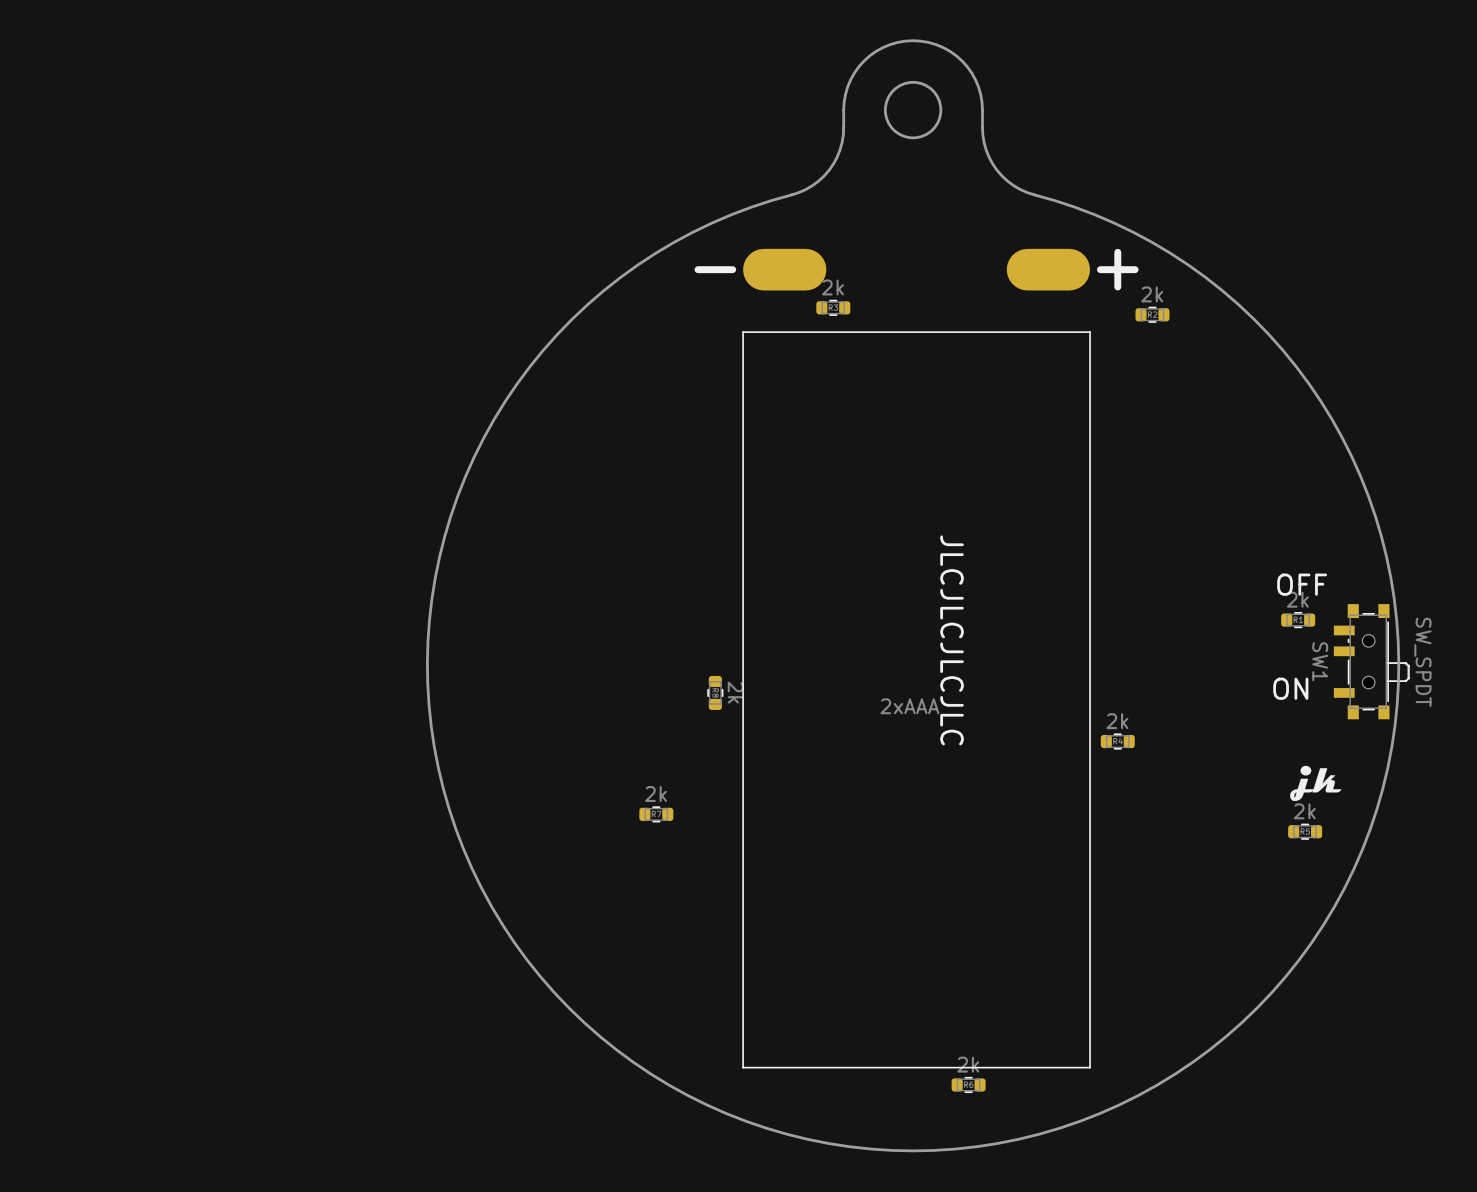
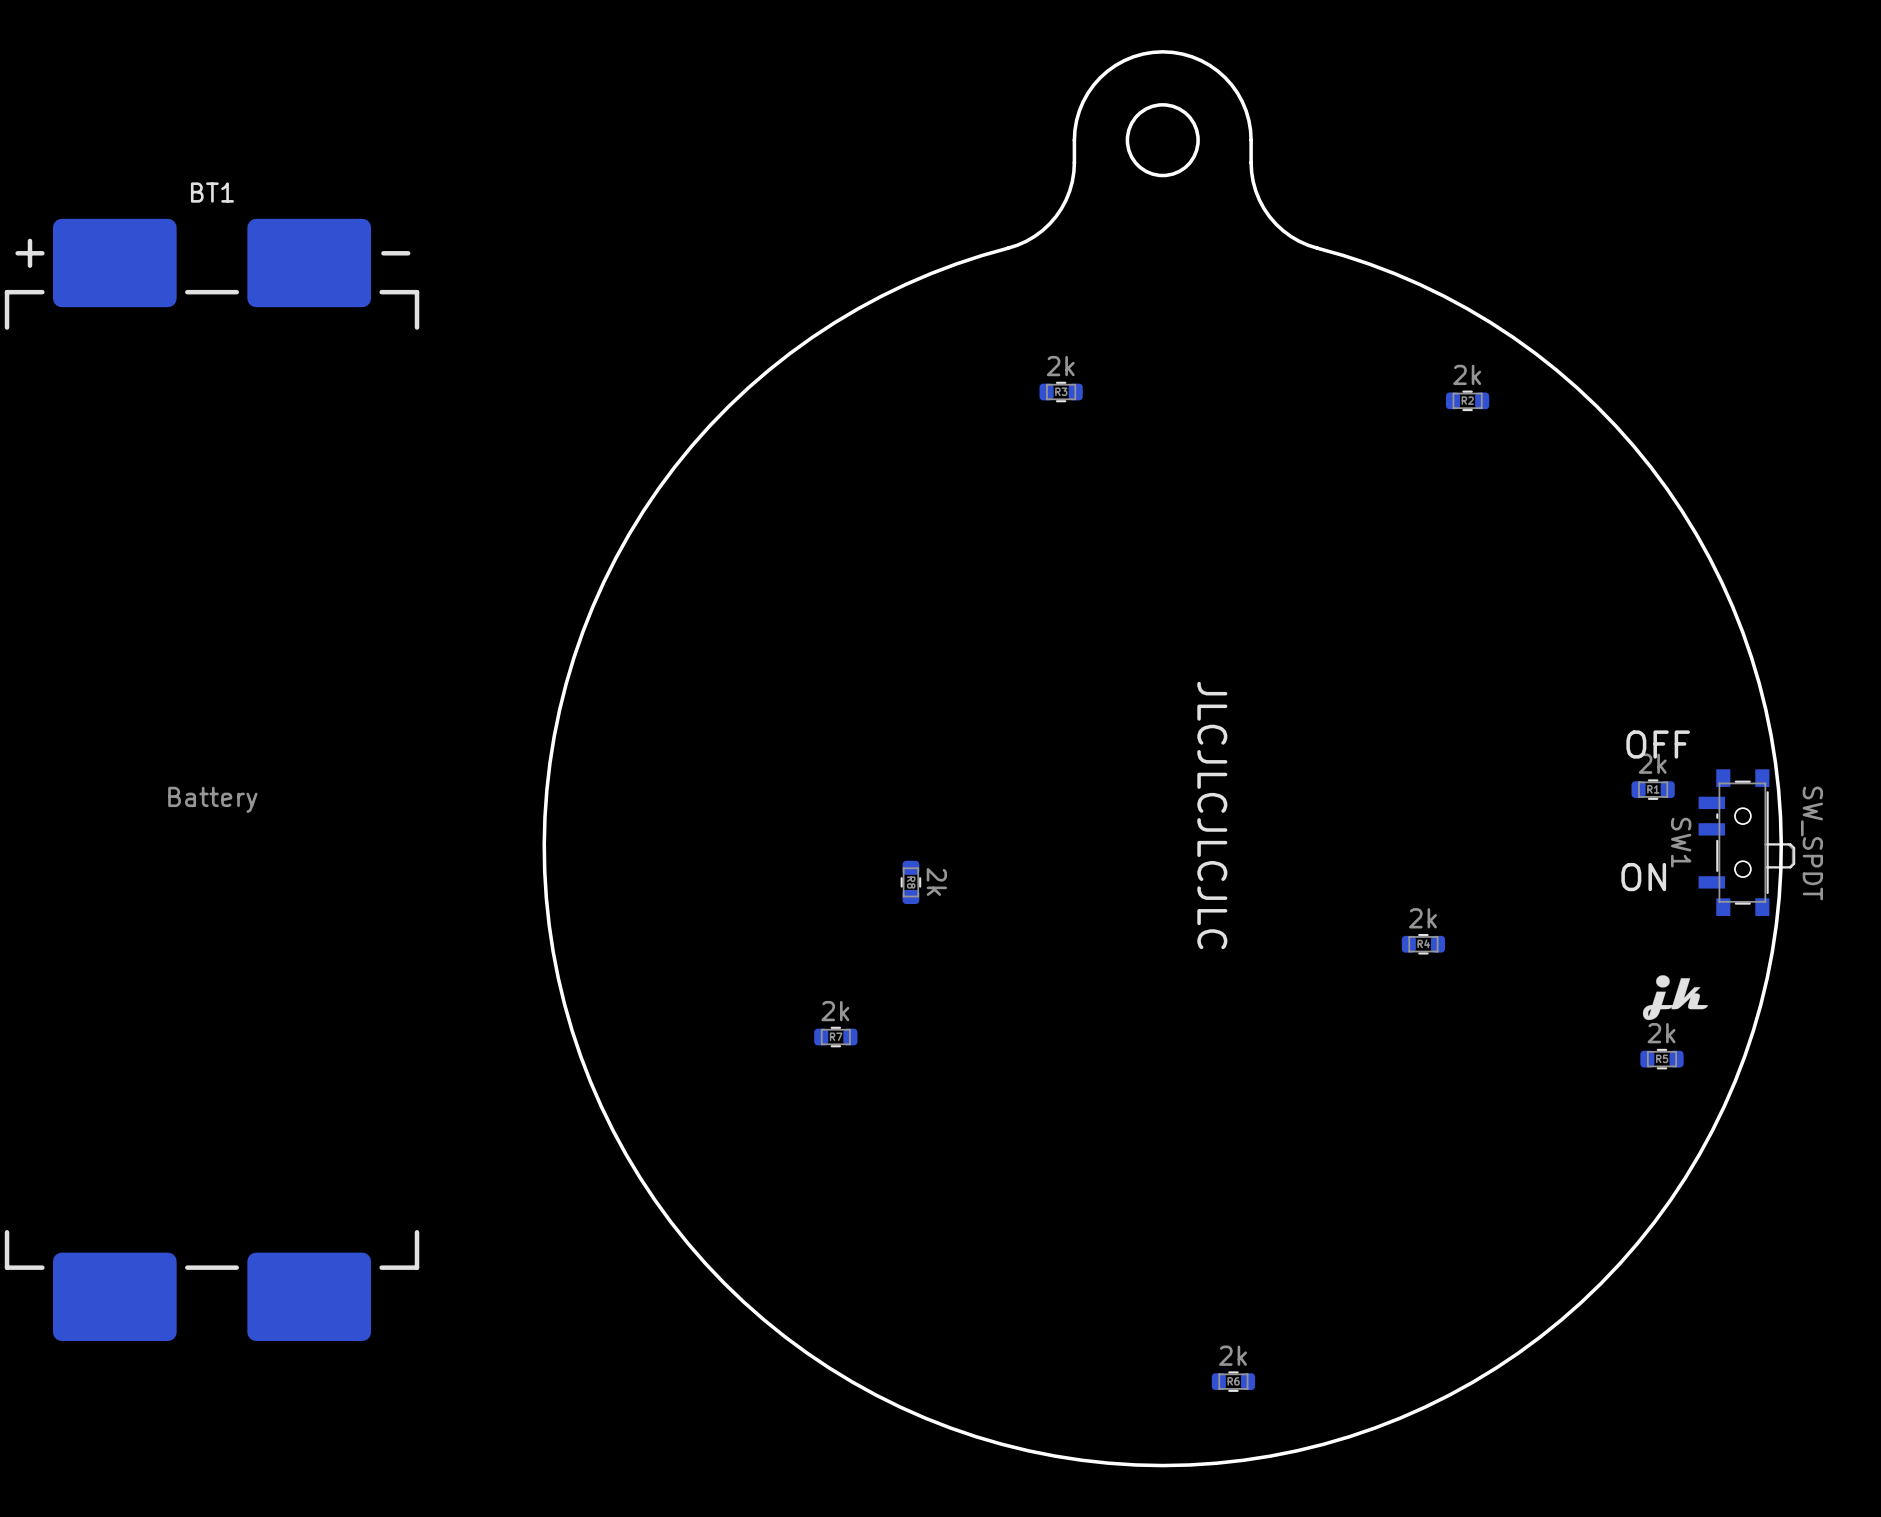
BT1: none -> Battery (212, 779)
part: 2xAAA (916, 658) -> none

